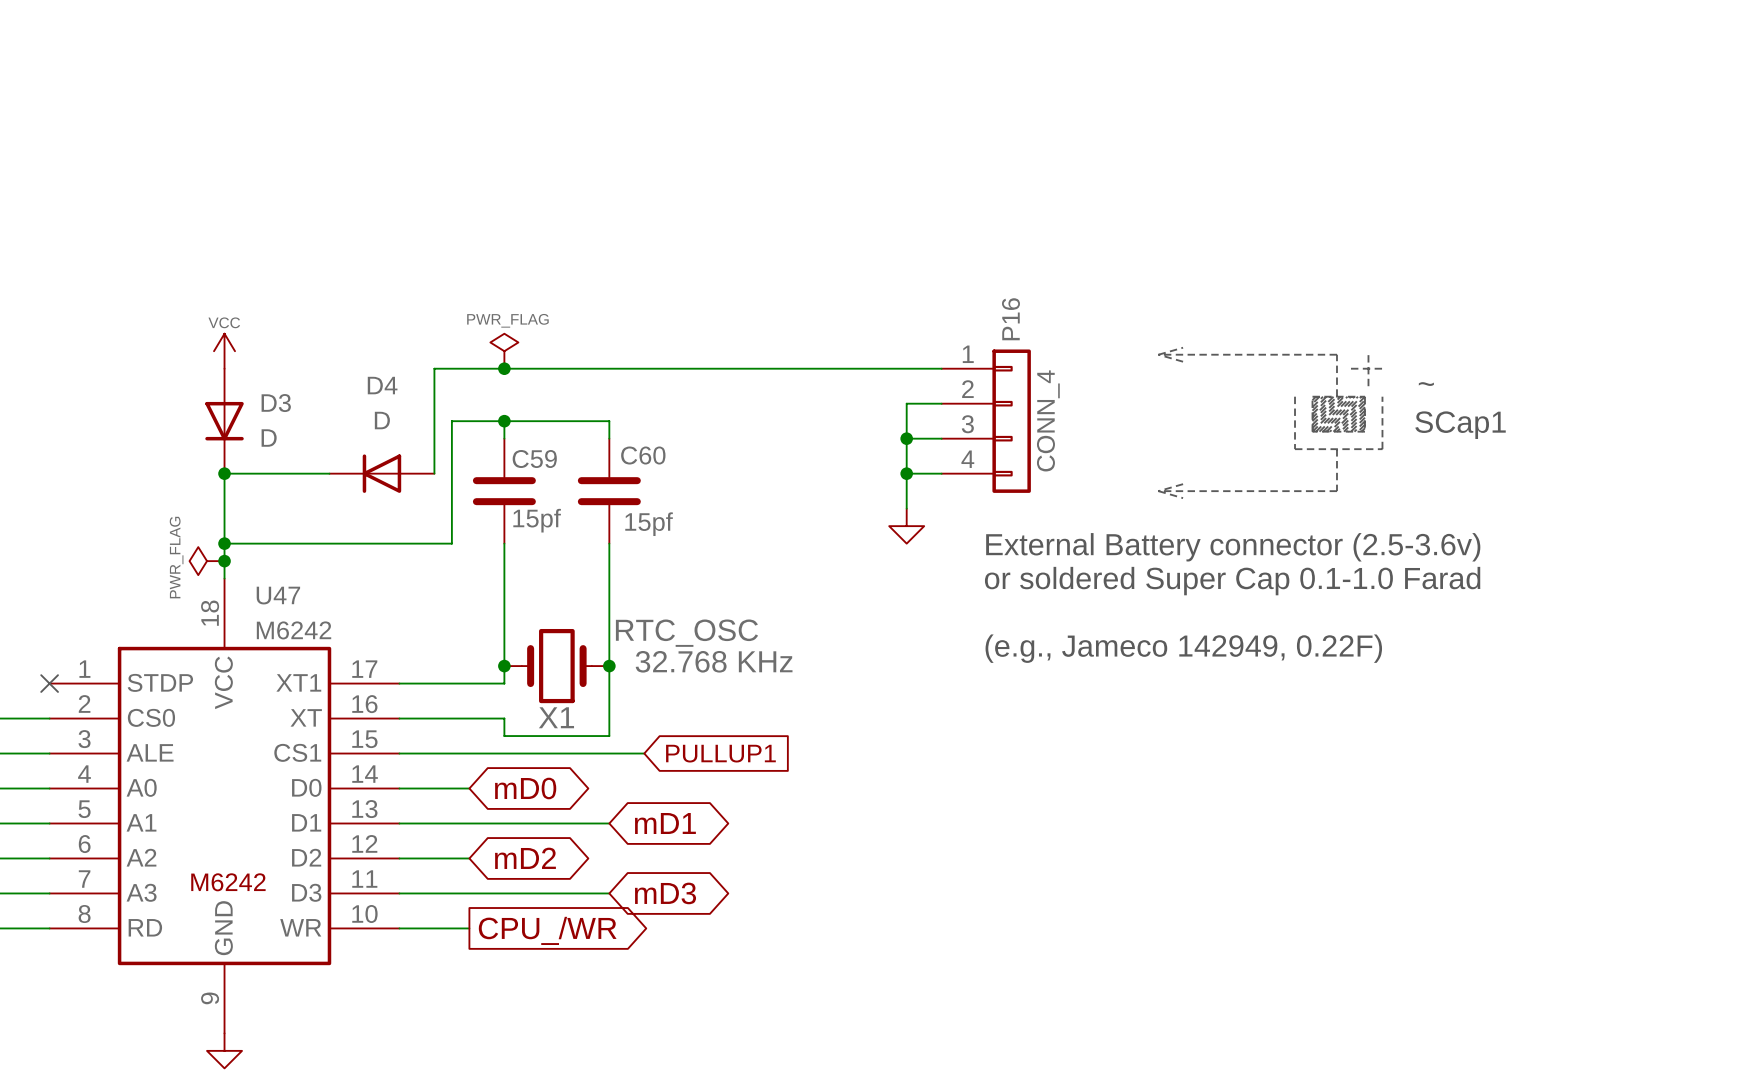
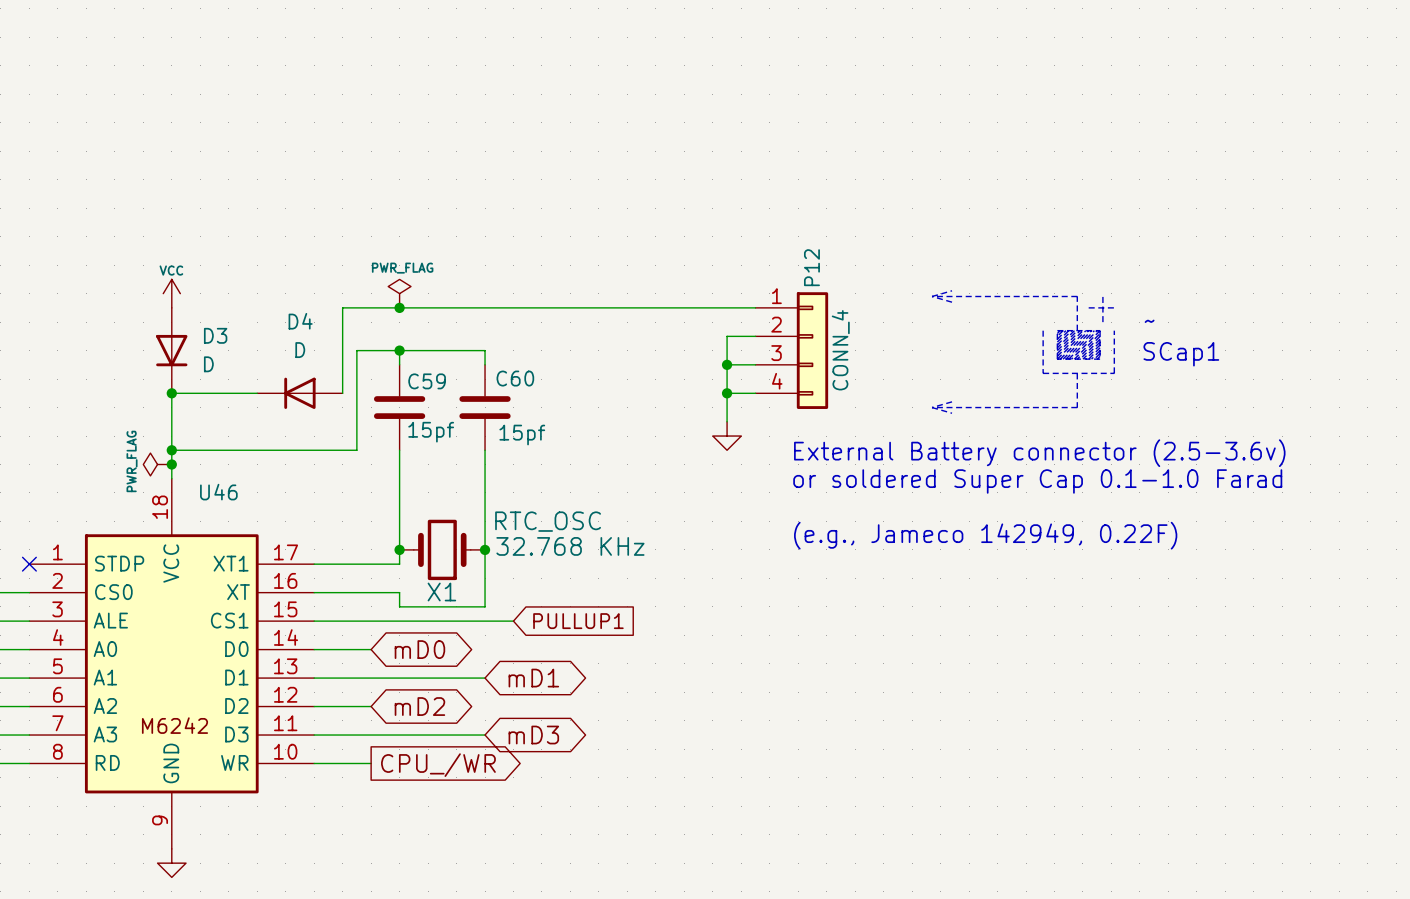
P16 name: P16 (1010, 319) -> P12 (811, 267)
U47 name: U47 (278, 595) -> U46 (218, 492)
U47 value: M6242 (294, 630) -> none

